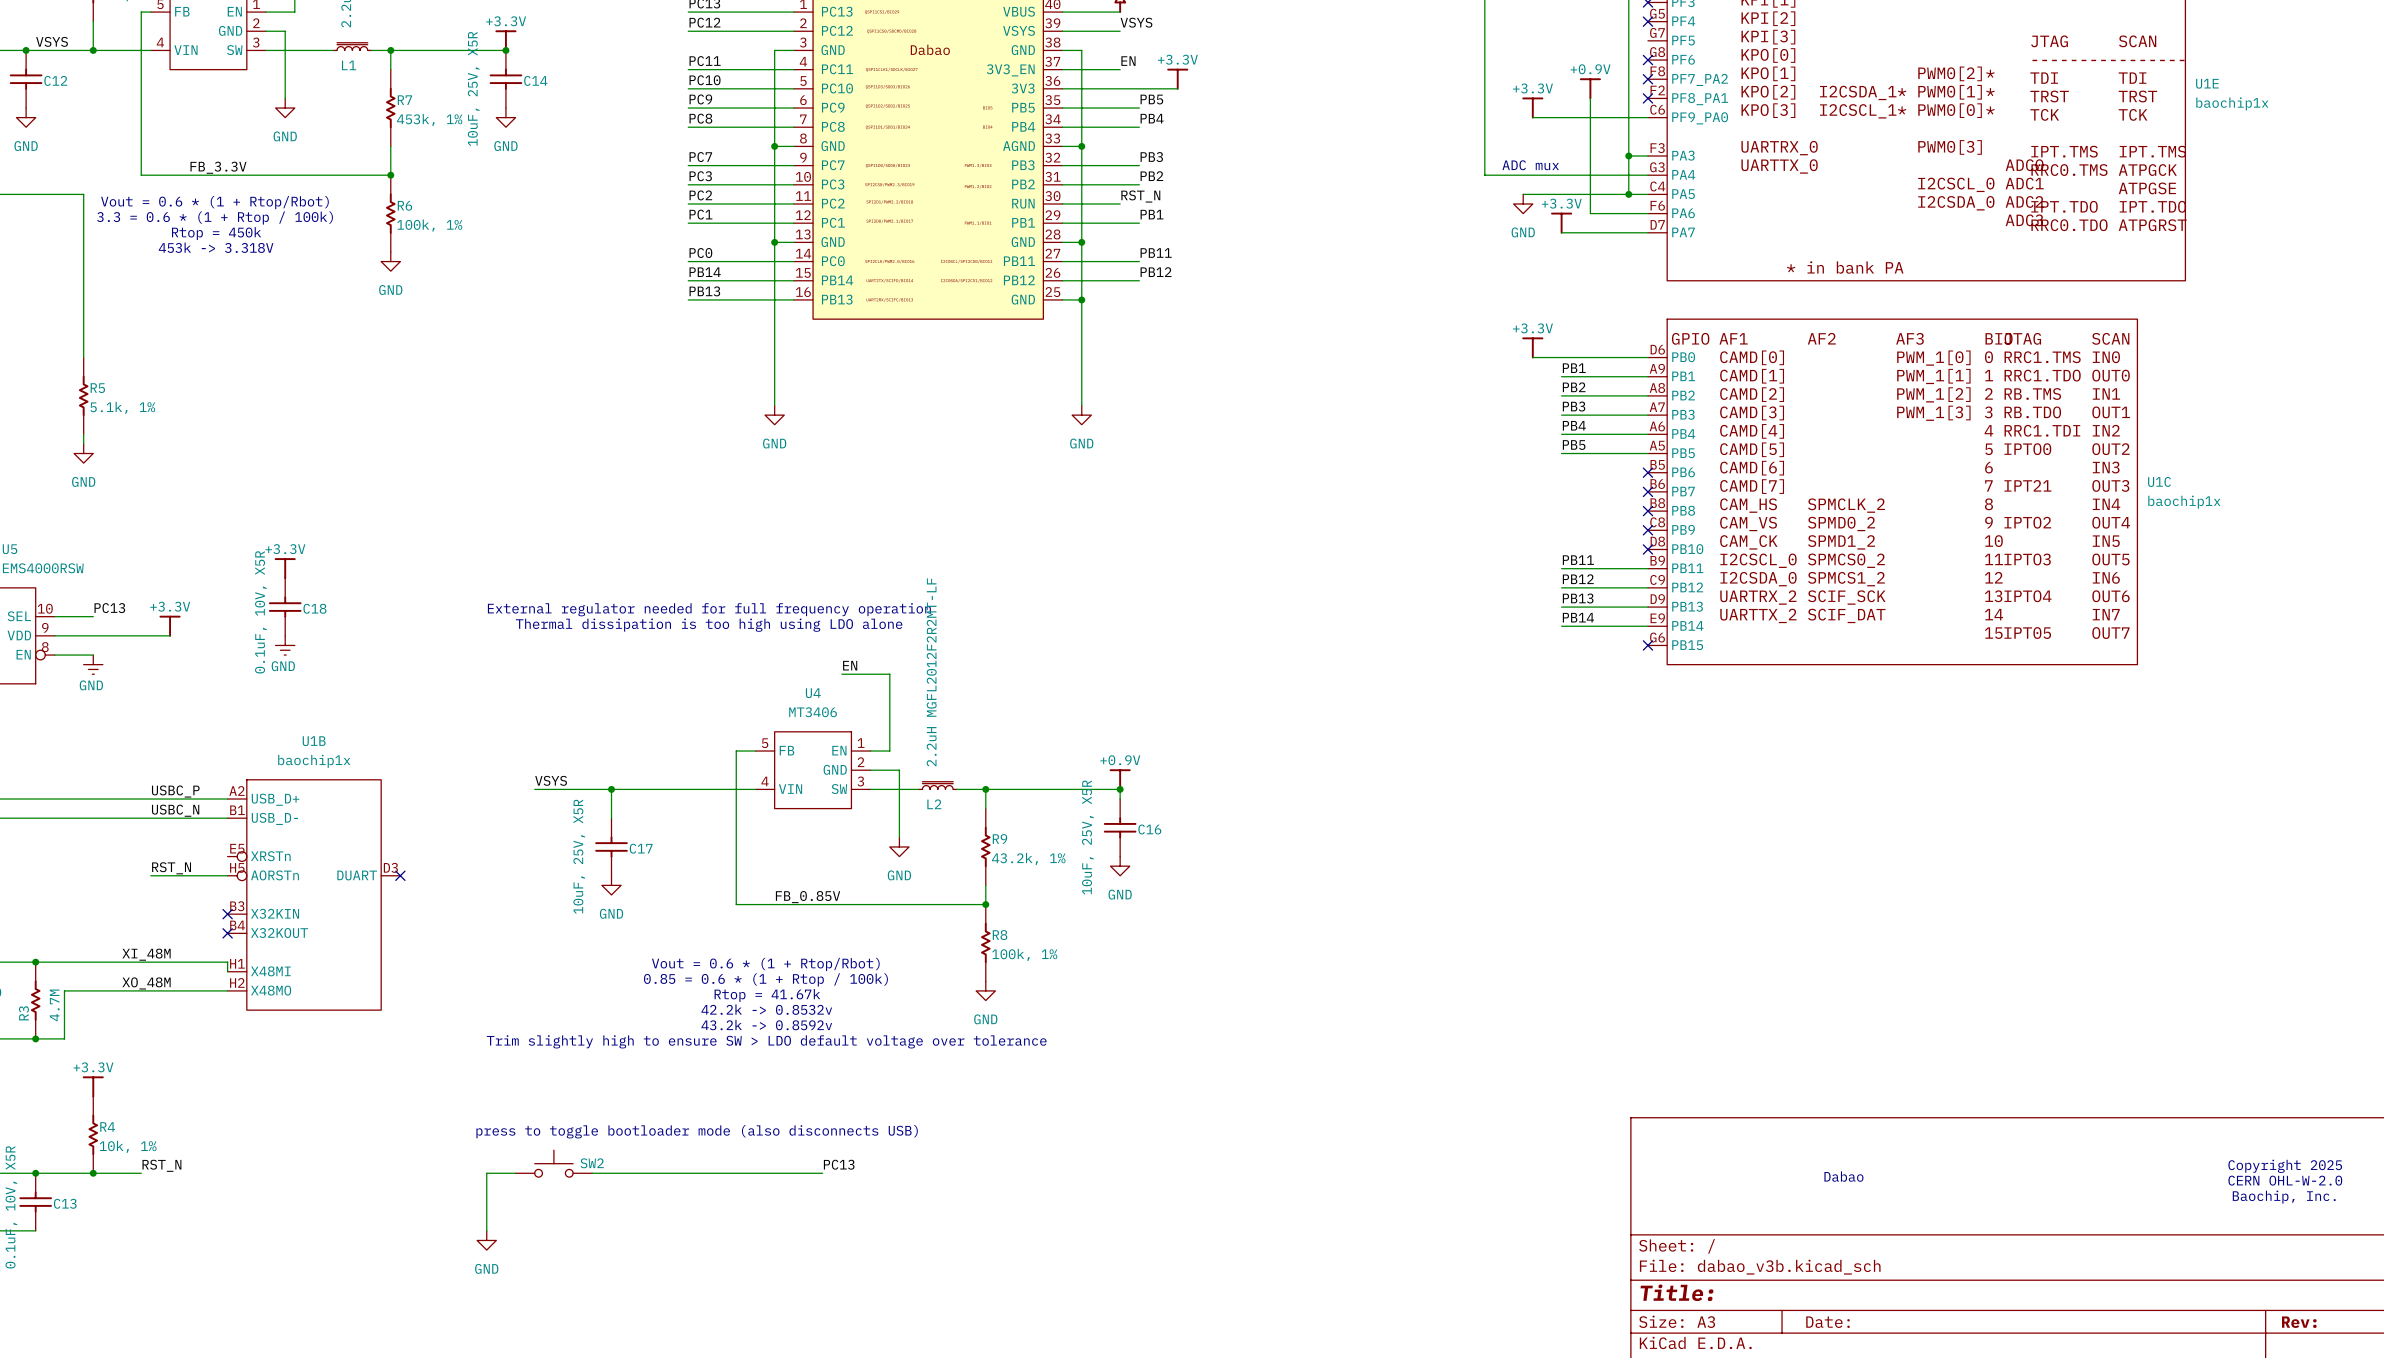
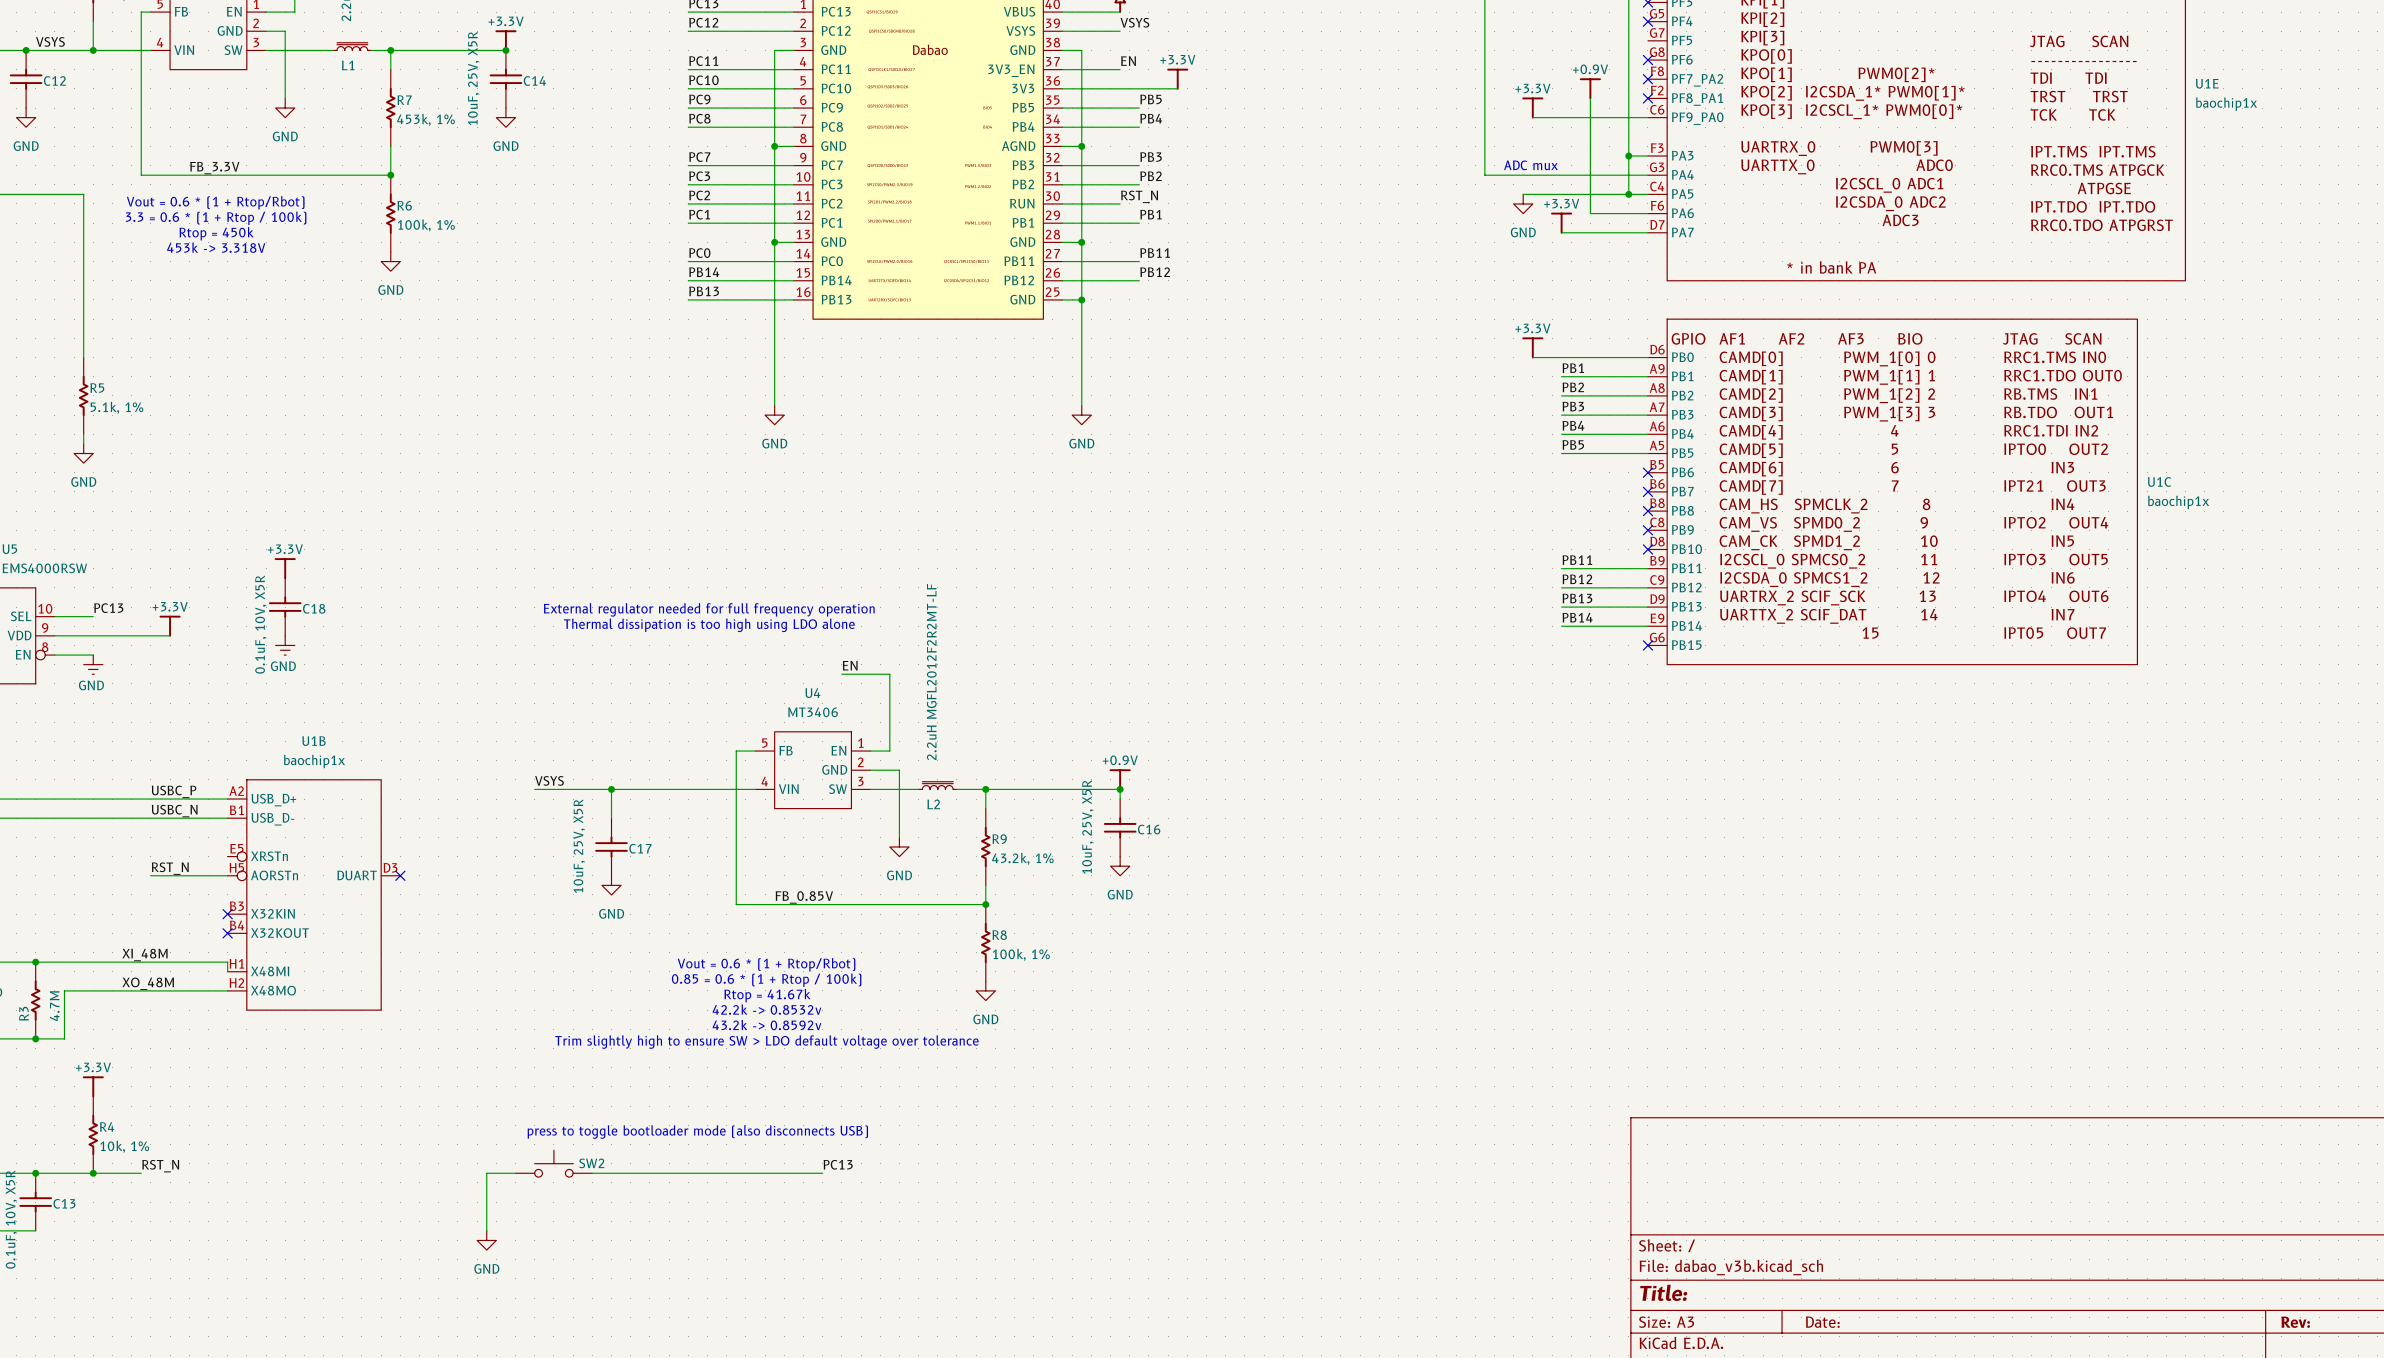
text: Copyright 2025 (2285, 1166) -> none
text: Dabao (1843, 1176) -> none
text: CERN OHL-W-2.0 (2285, 1180) -> none
text: Baochip, Inc. (2284, 1197) -> none

